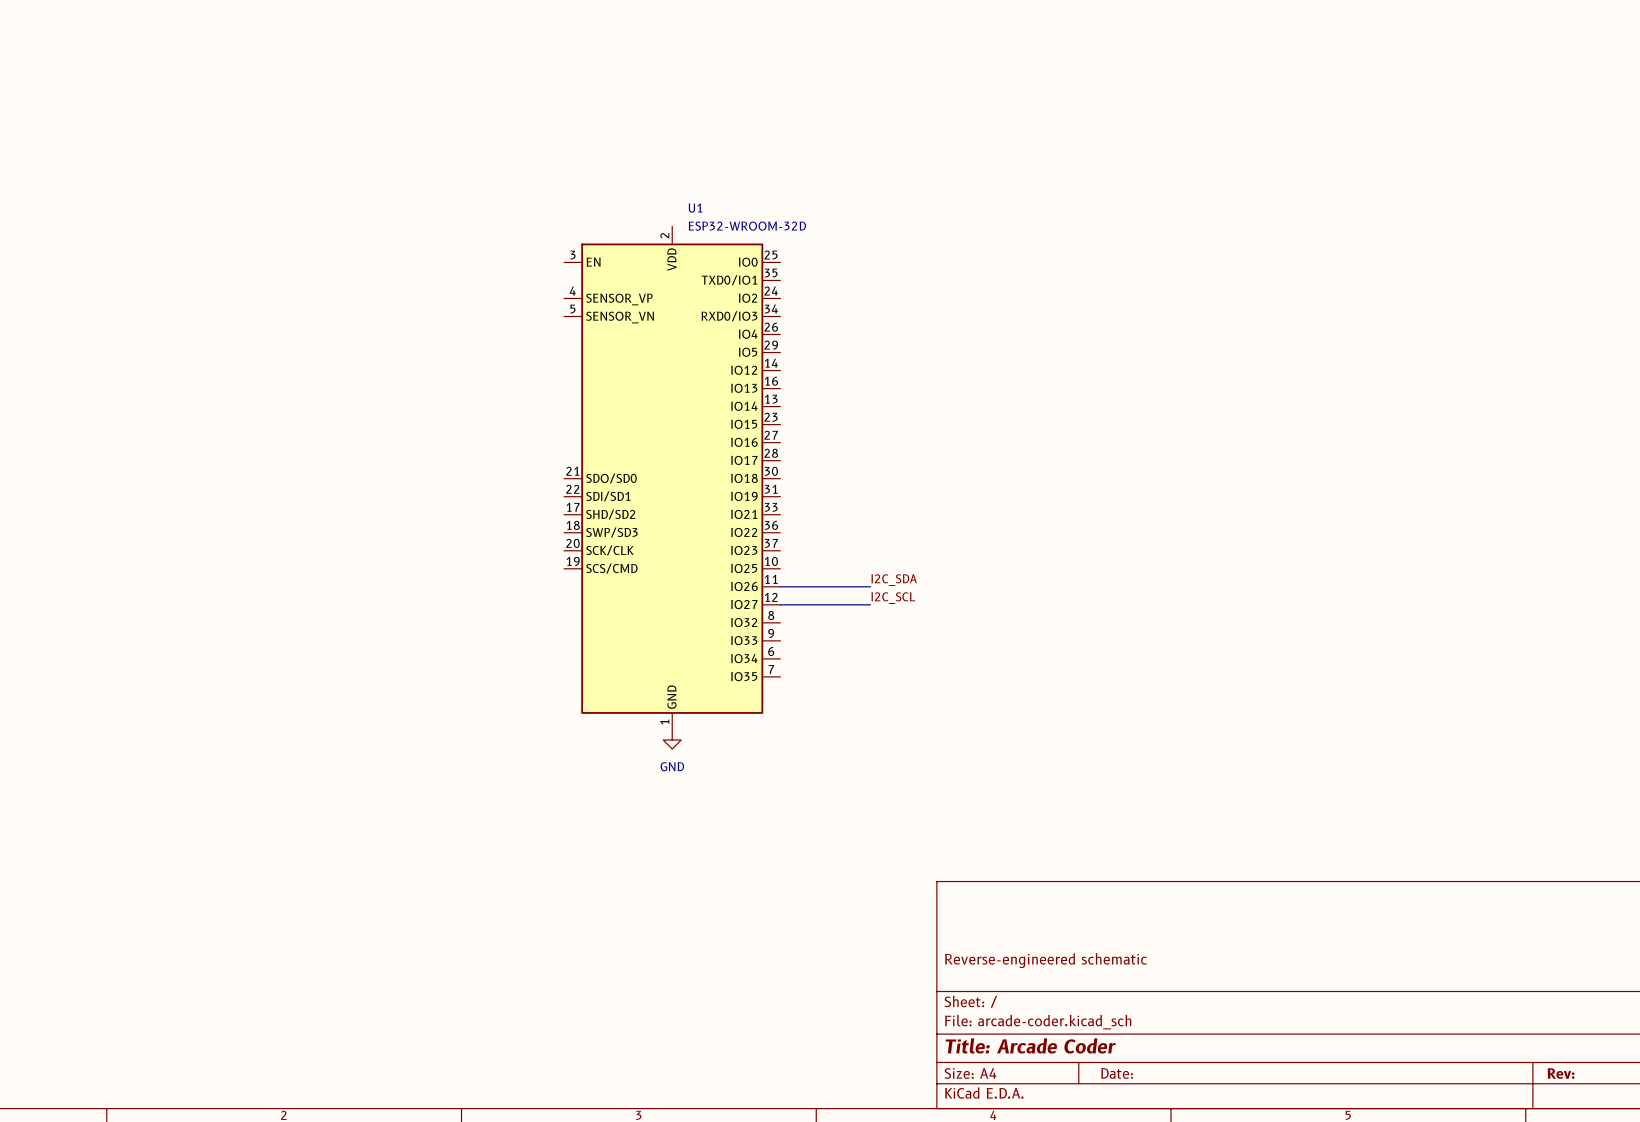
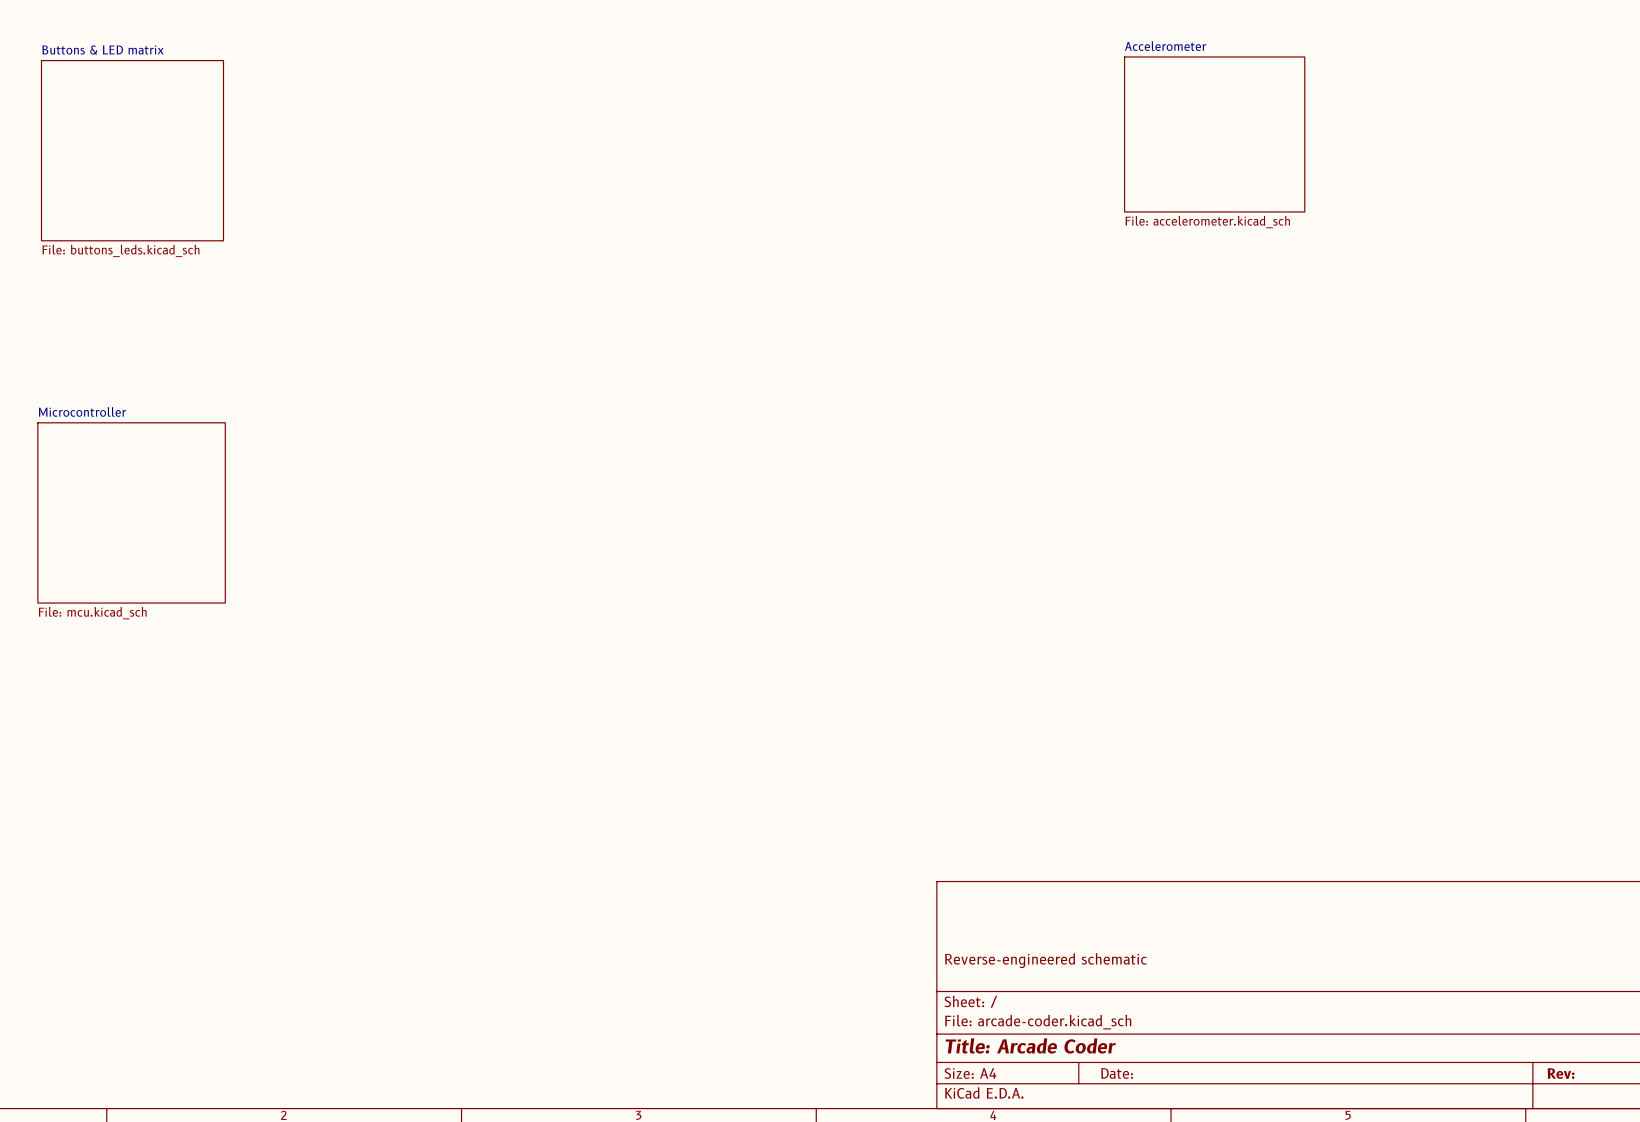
sheet Accelerometer: none -> File: accelerometer.kicad_sch (1214, 134)
sheet Buttons & LED matrix: none -> File: buttons_leds.kicad_sch (132, 150)
U1: ESP32-WROOM-32D (672, 478) -> none
sheet Microcontroller: none -> File: mcu.kicad_sch (131, 512)
label: I2C_SDA (894, 580) -> none
wire: (780, 586) (870, 586) -> none
label: I2C_SCL (893, 598) -> none
wire: (780, 604) (870, 604) -> none
power symbol: GND (672, 739) -> none

